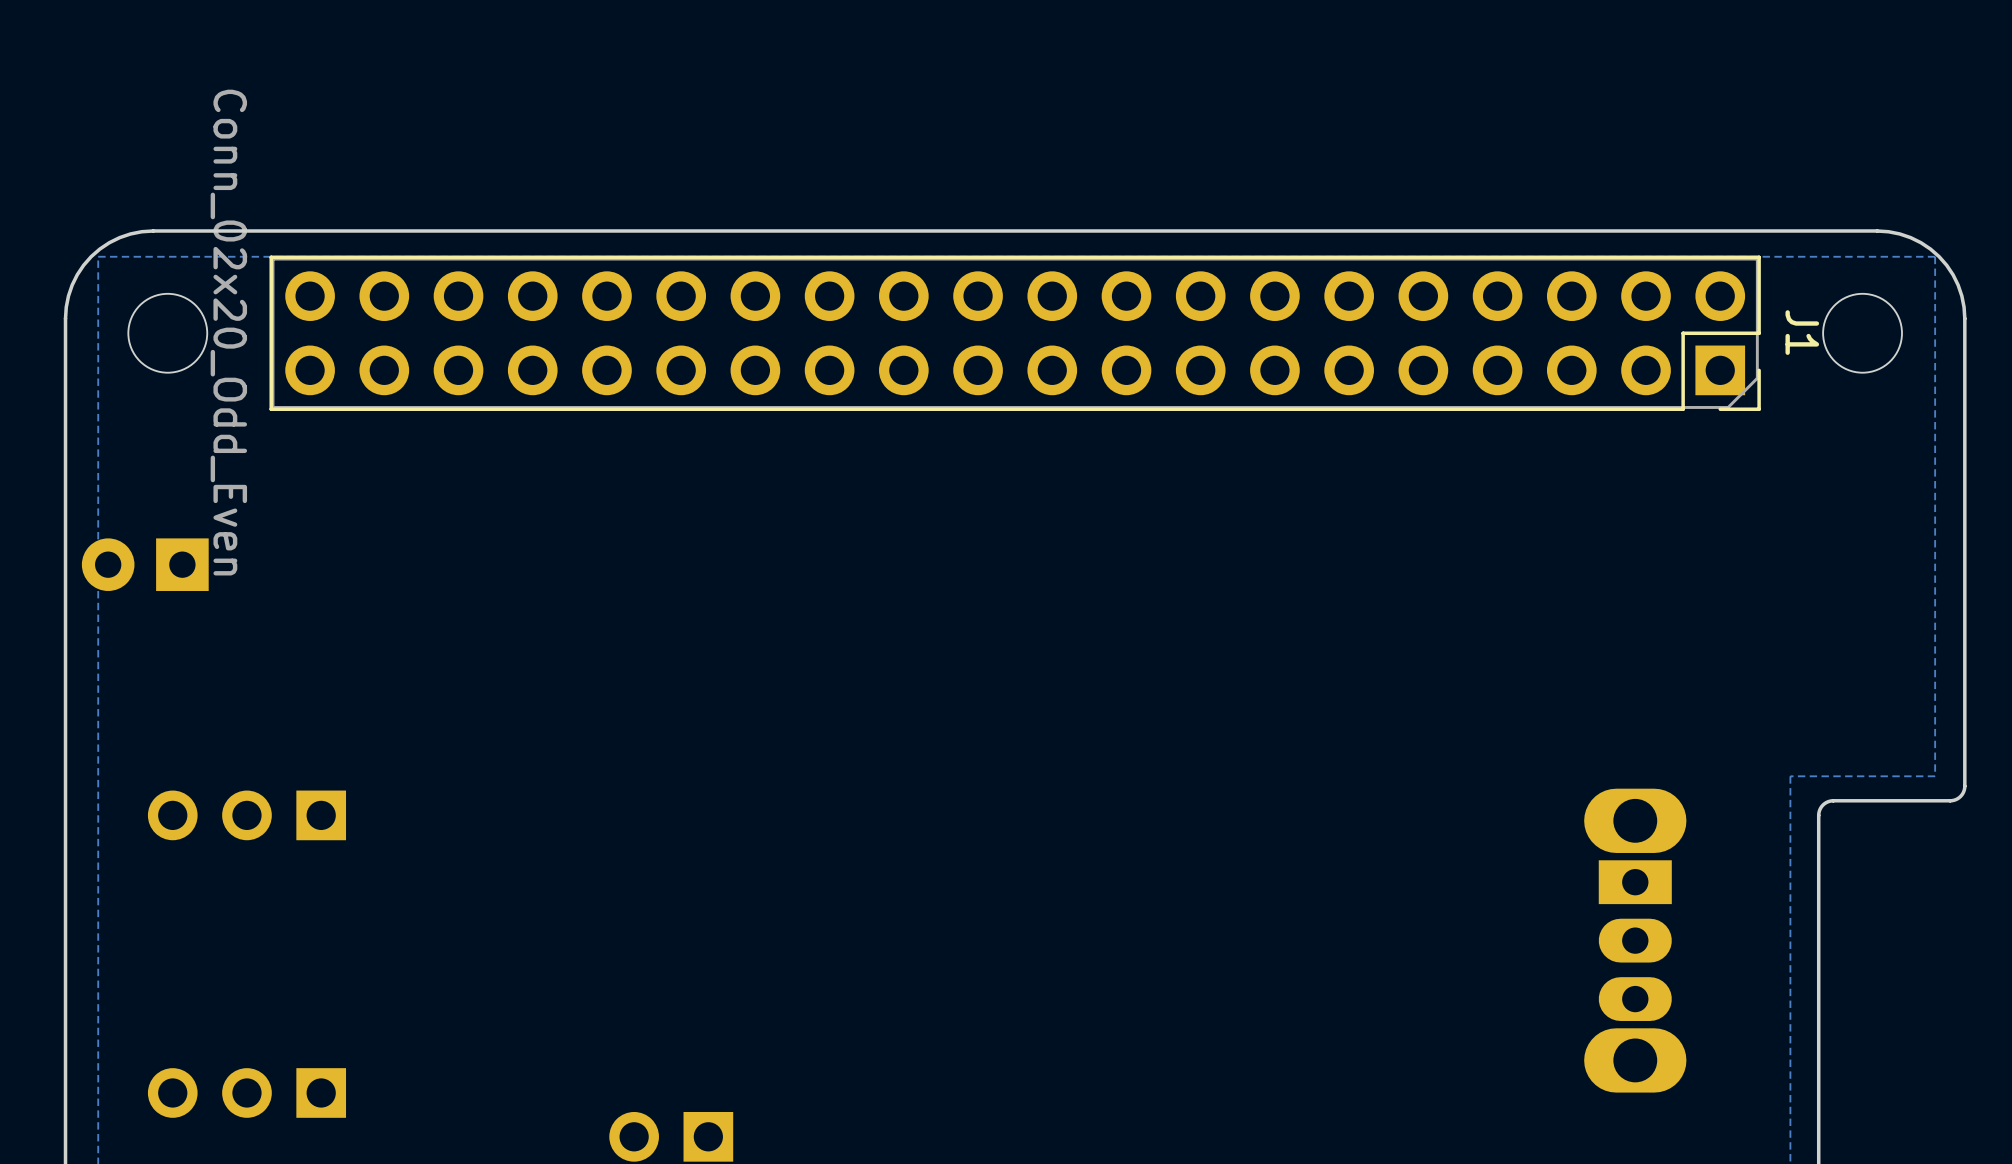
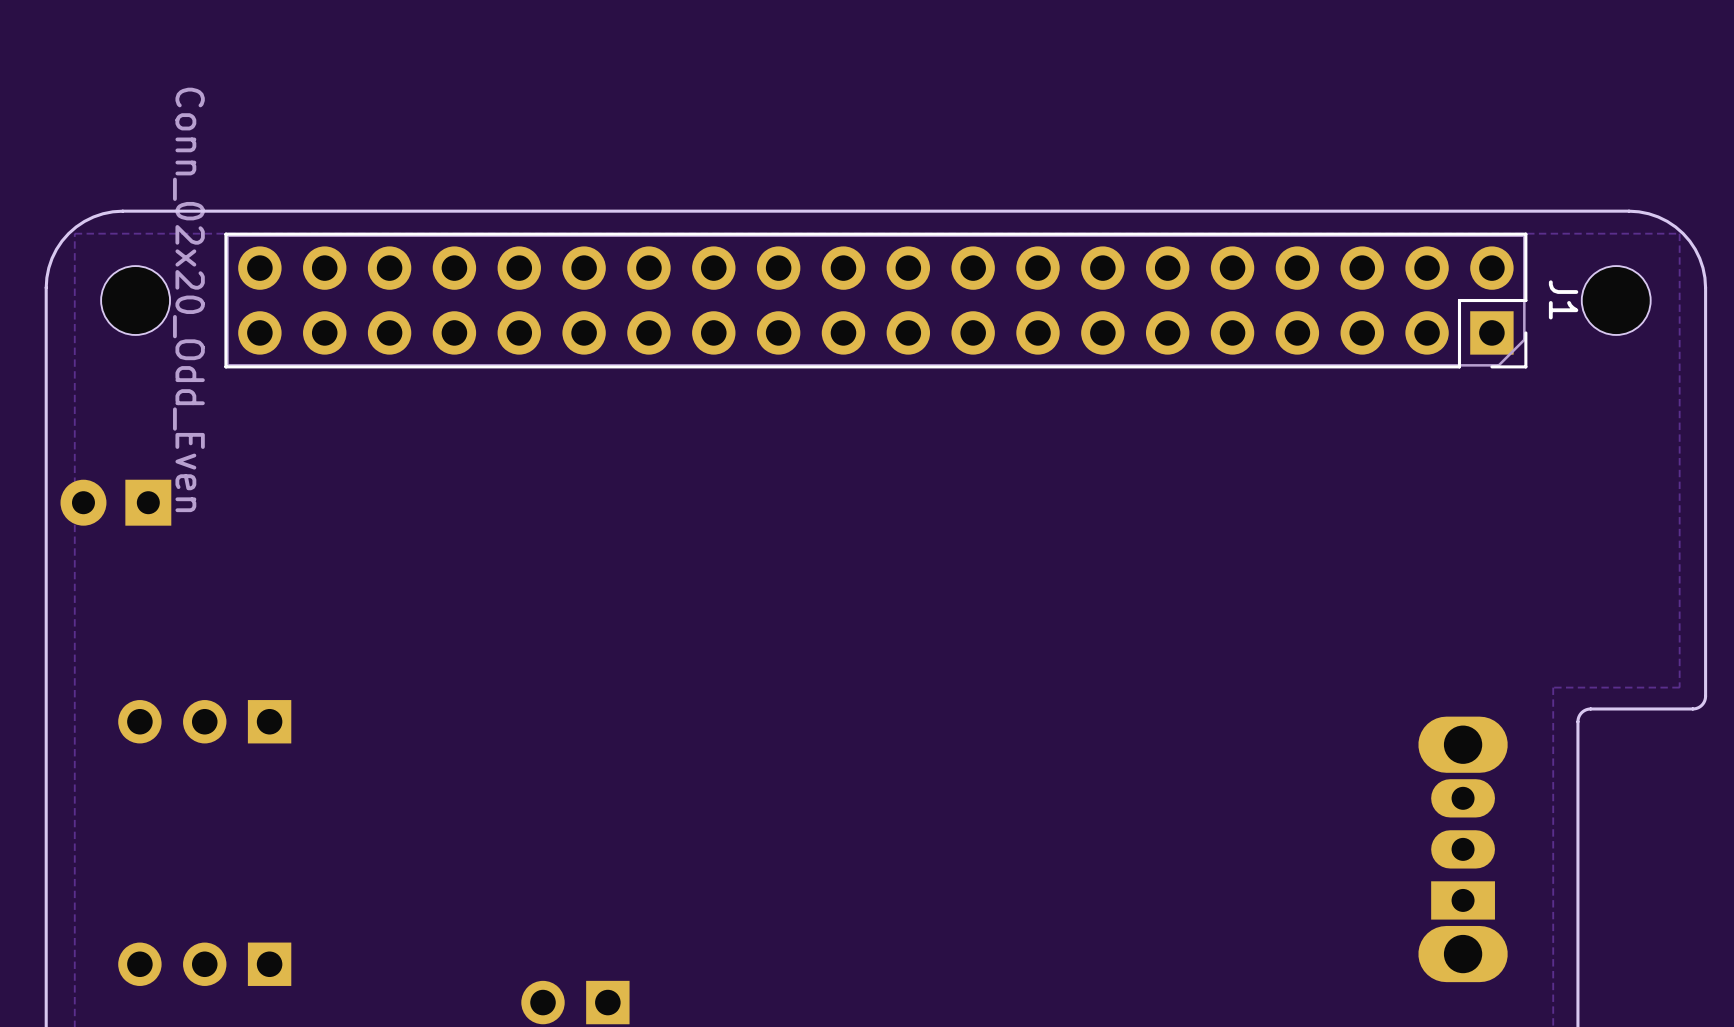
part rotation: 0° (1635, 940) -> 180° (1463, 849)

